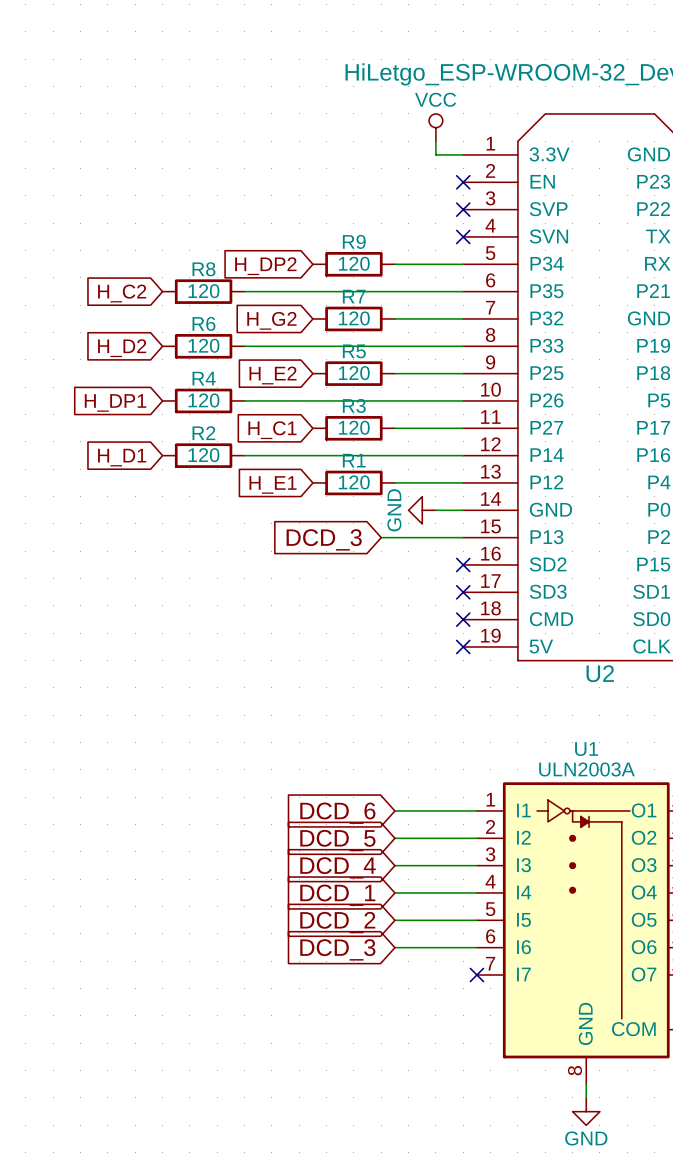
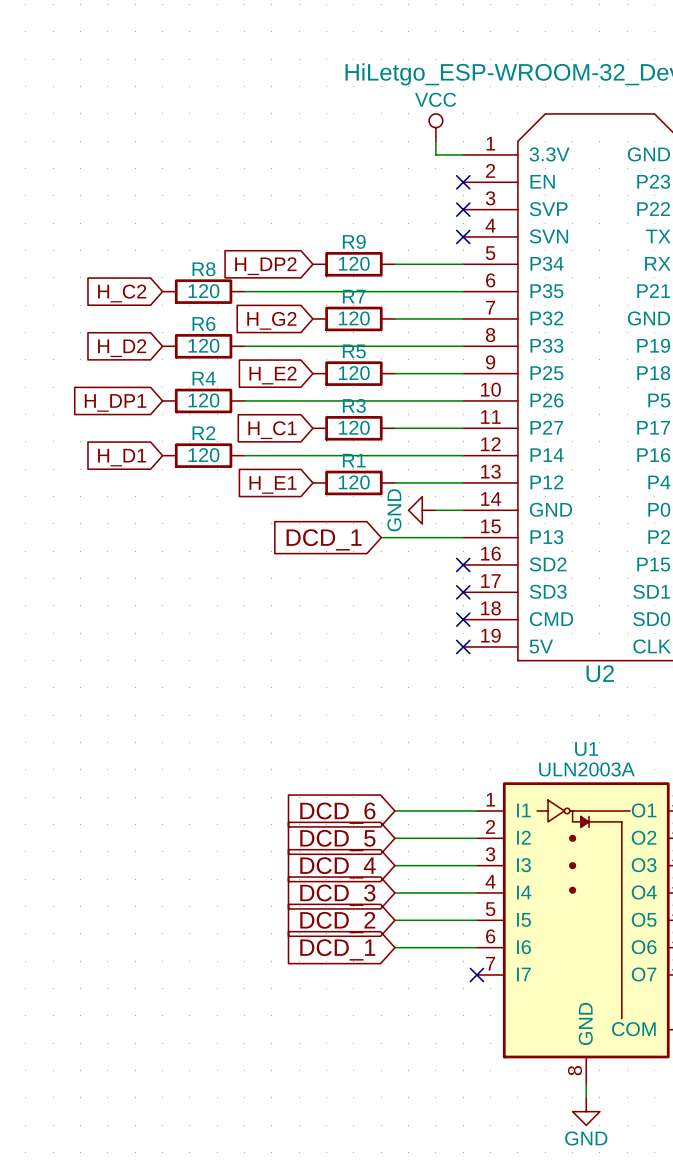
global label: DCD_3 (324, 539) -> DCD_1 (324, 539)
global label: DCD_1 (337, 895) -> DCD_3 (337, 895)
global label: DCD_3 (337, 949) -> DCD_1 (337, 949)

